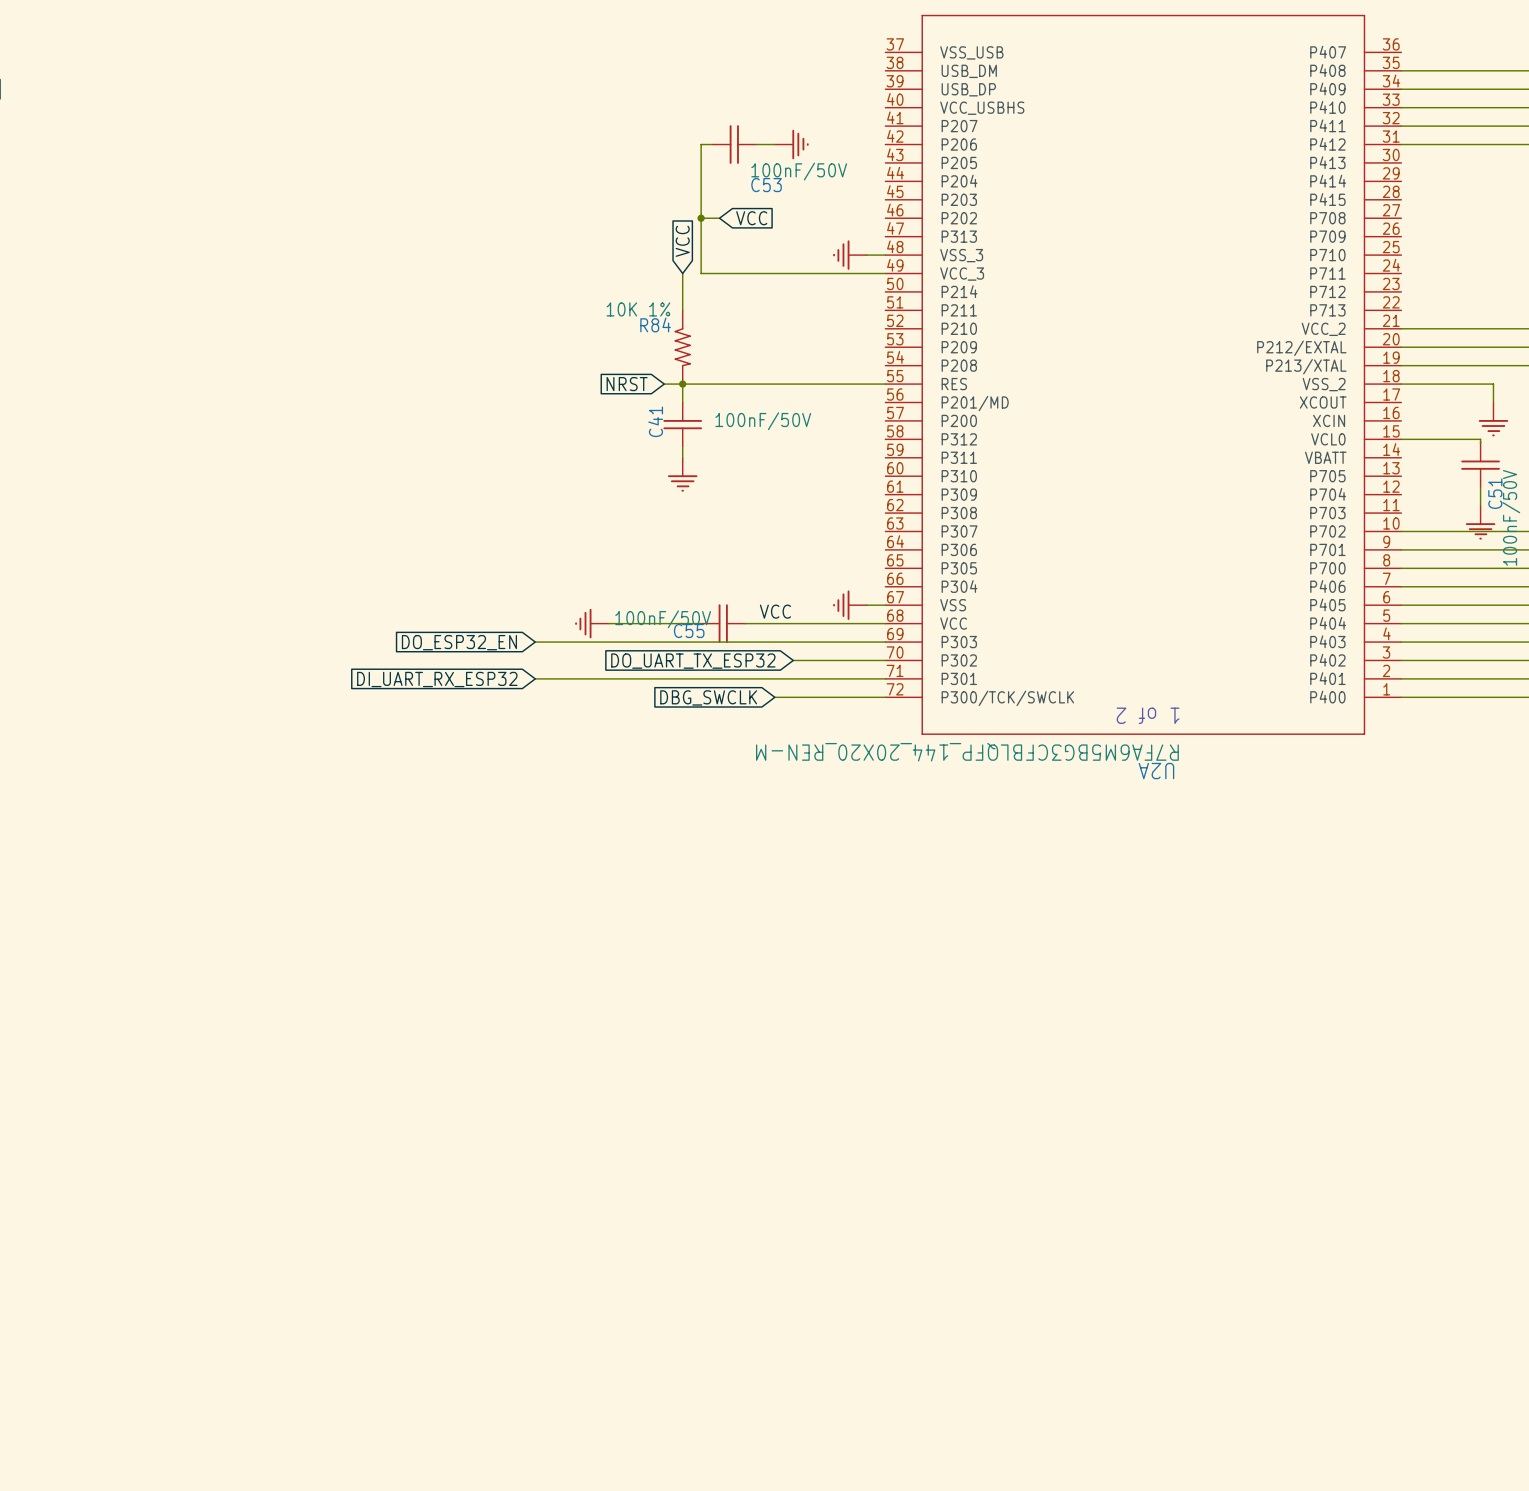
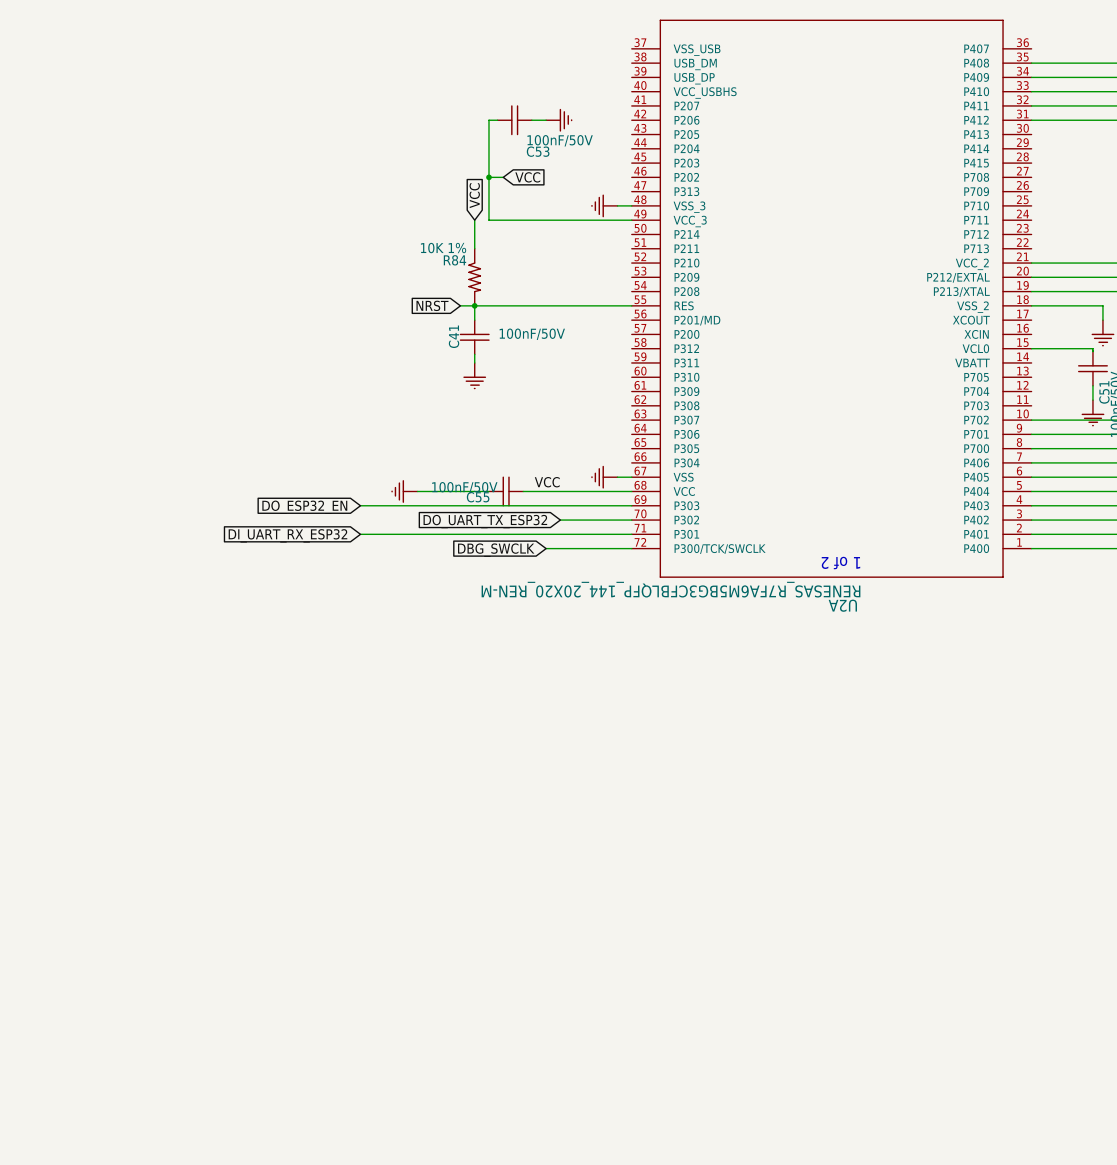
U2A value: R7FA6M5BG3CFBLQFP_144_20X20_REN-M (967, 752) -> RENESAS_R7FA6M5BG3CFBLQFP_144_20X20_REN-M (671, 589)

